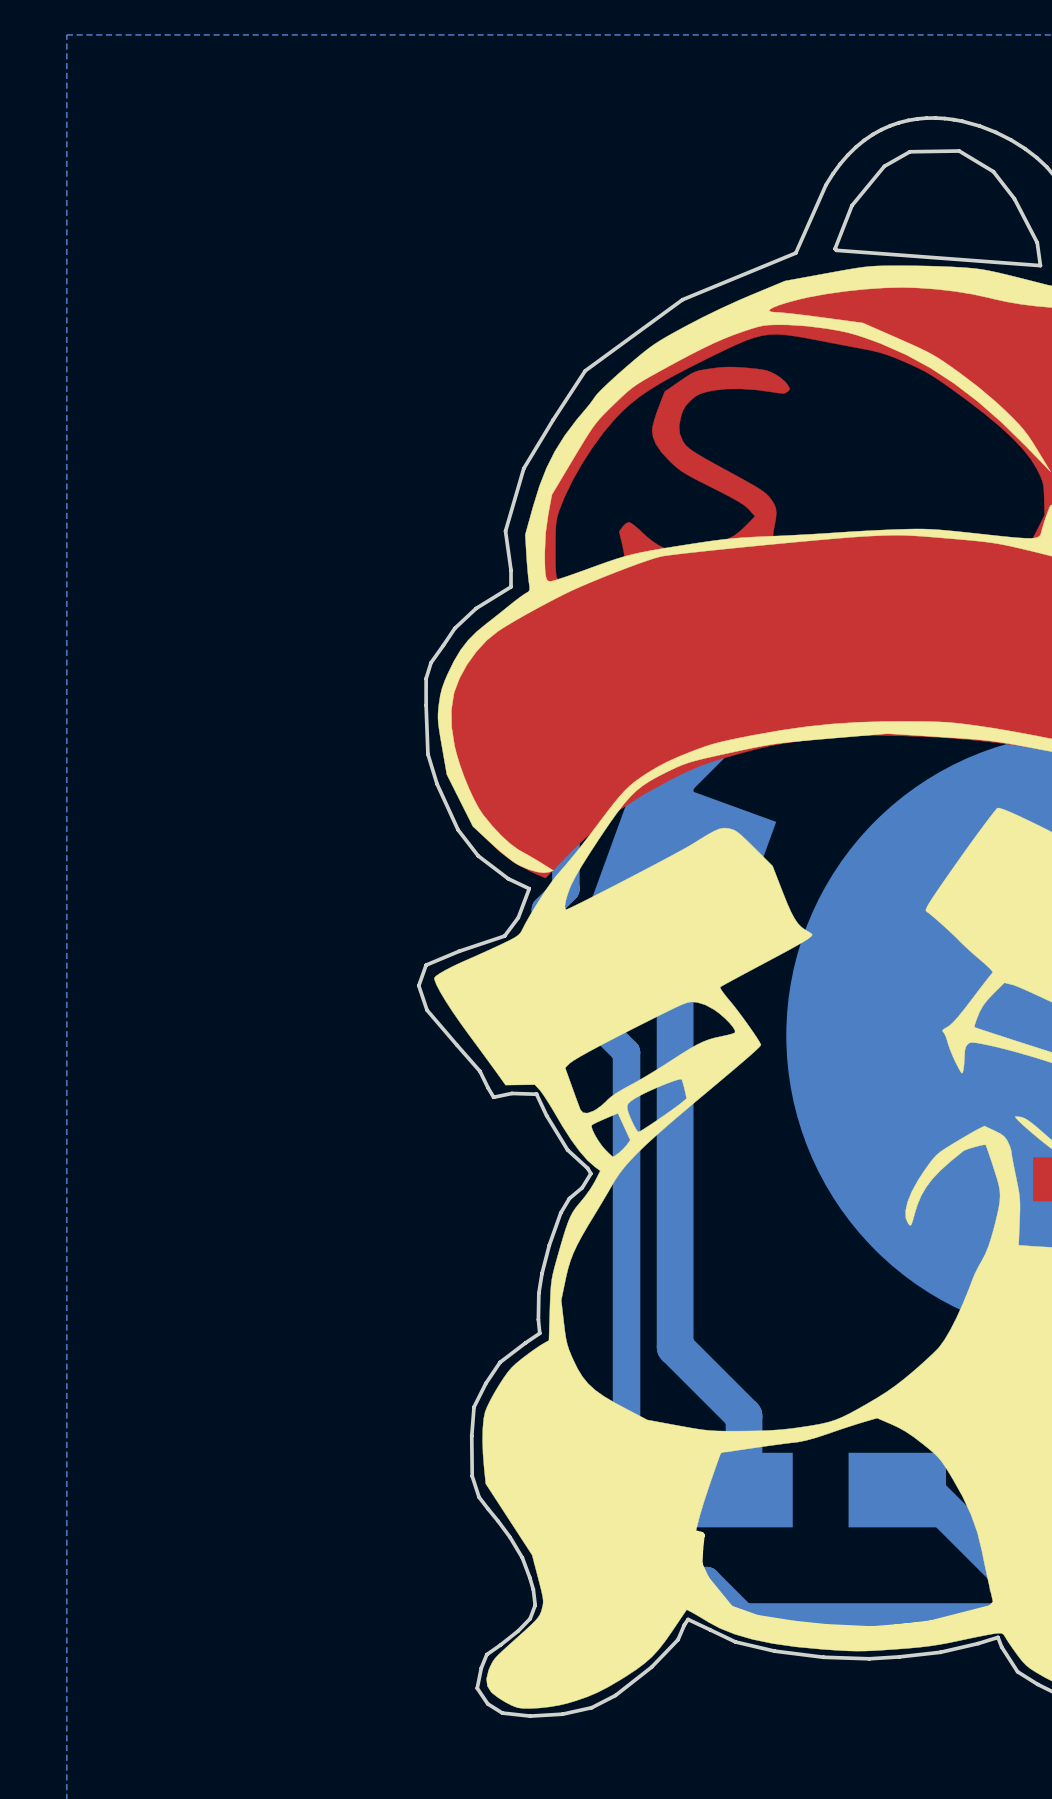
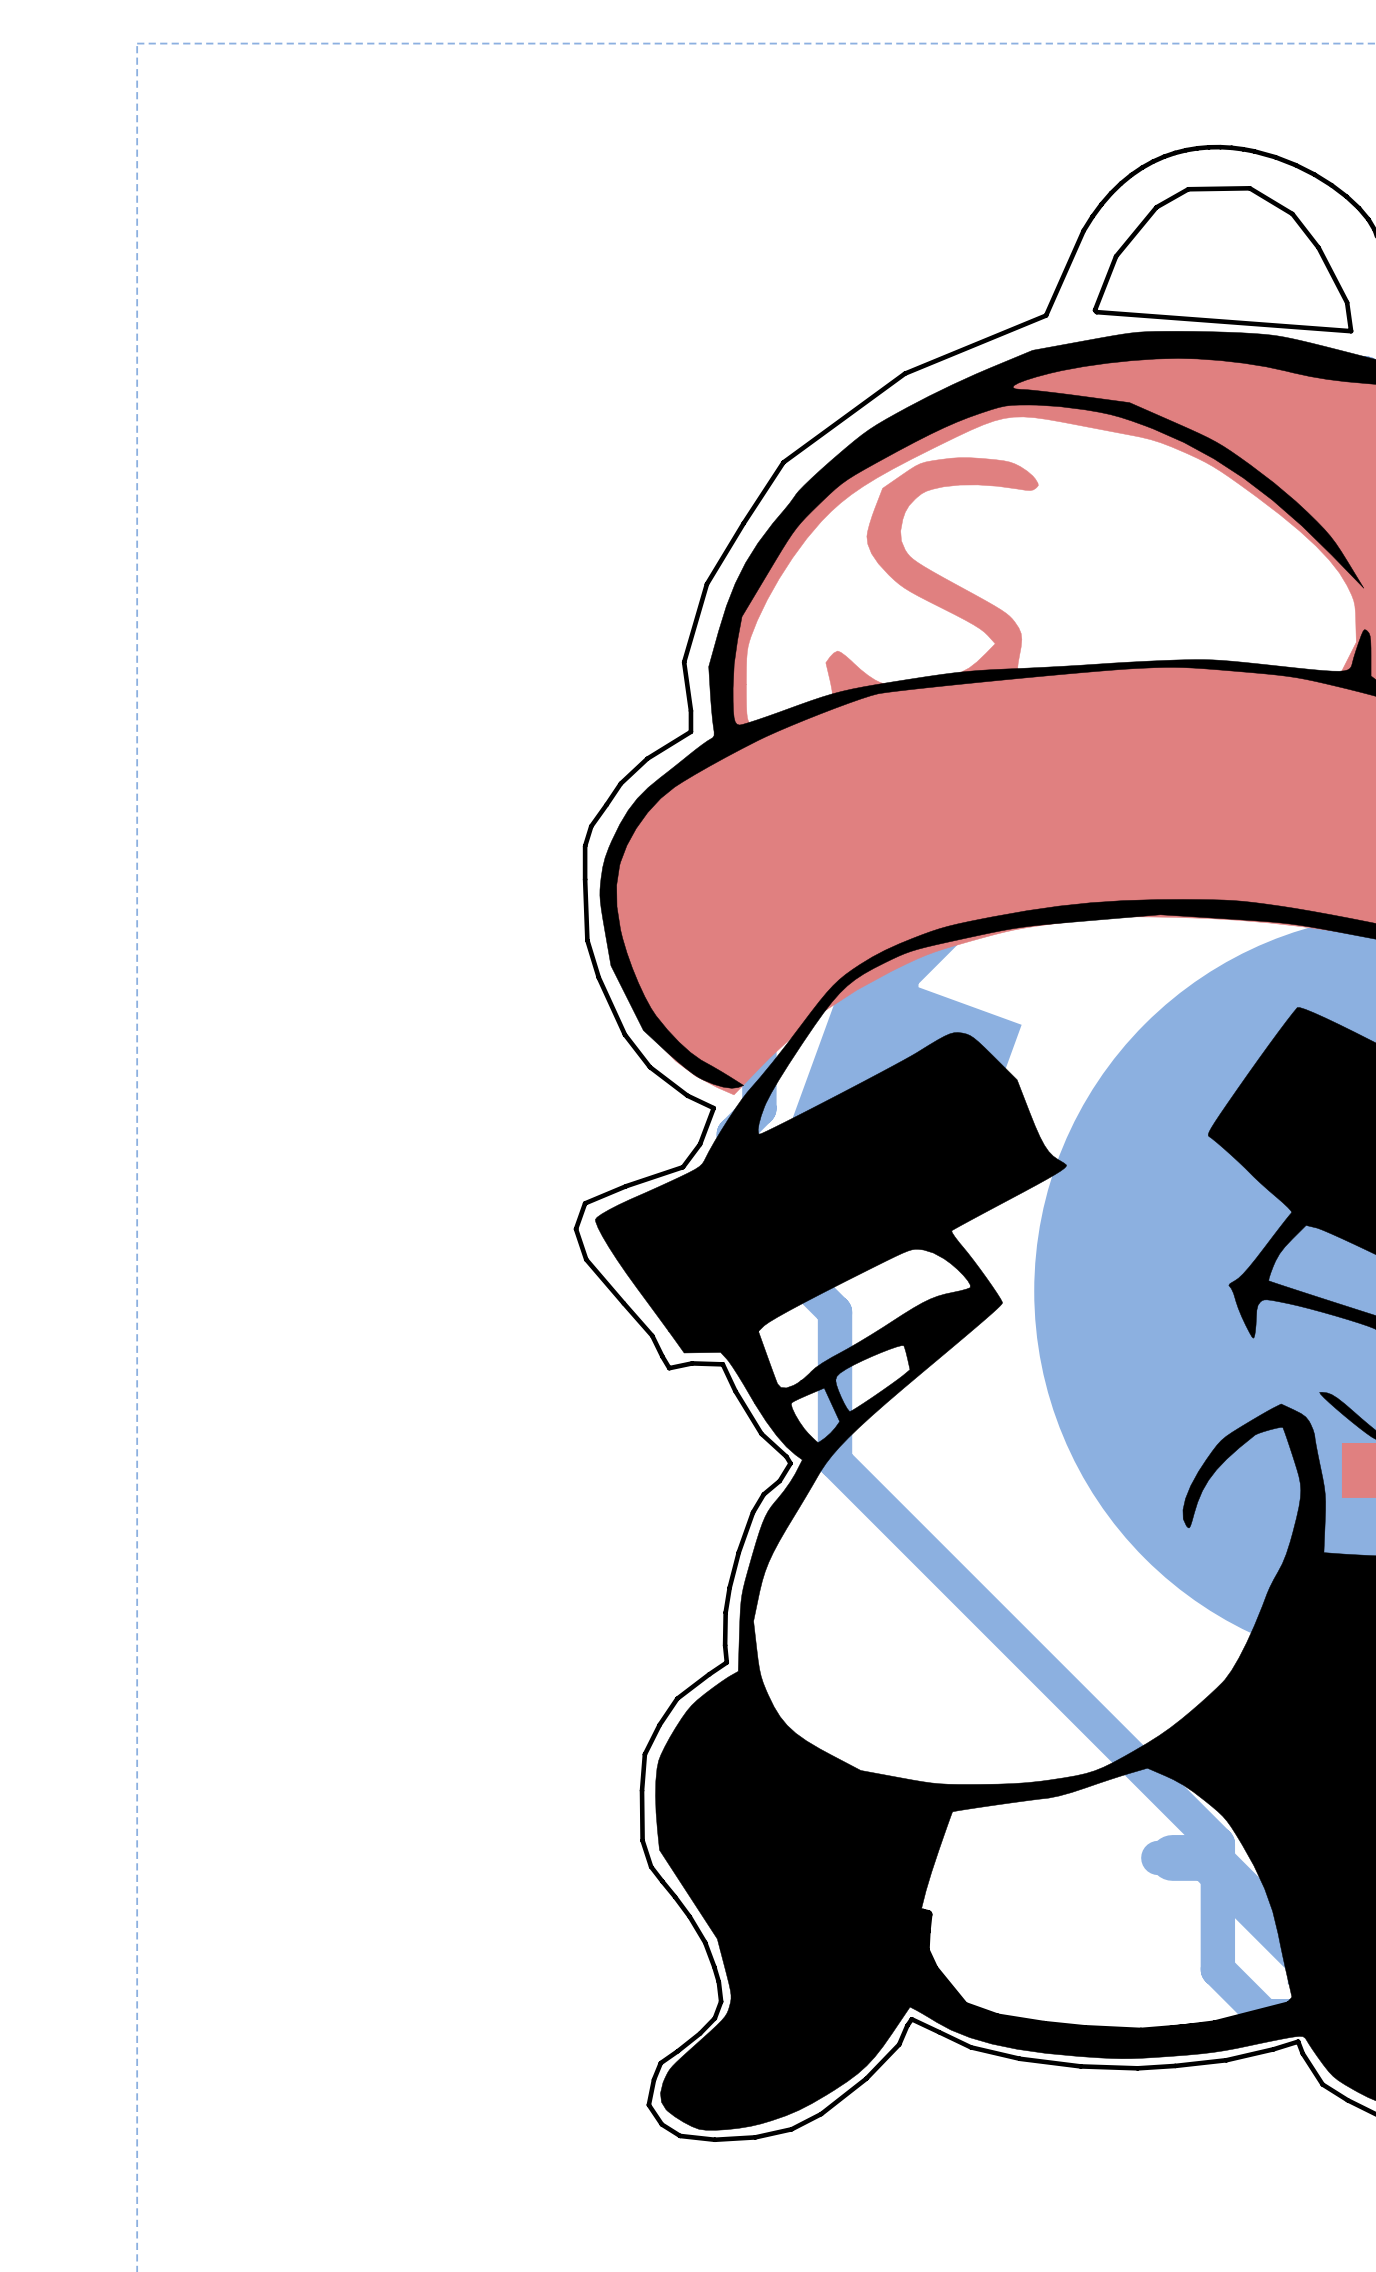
bottom track: (675, 884) (675, 1347) (744, 1416) (744, 1490) -> none
bottom track: (626, 1171) (626, 1527) (679, 1580) (706, 1580) (743, 1616) (970, 1616) -> (835, 1461) (1217, 1843) (1217, 1969) (1264, 2016)
part: (820, 1490) -> none

